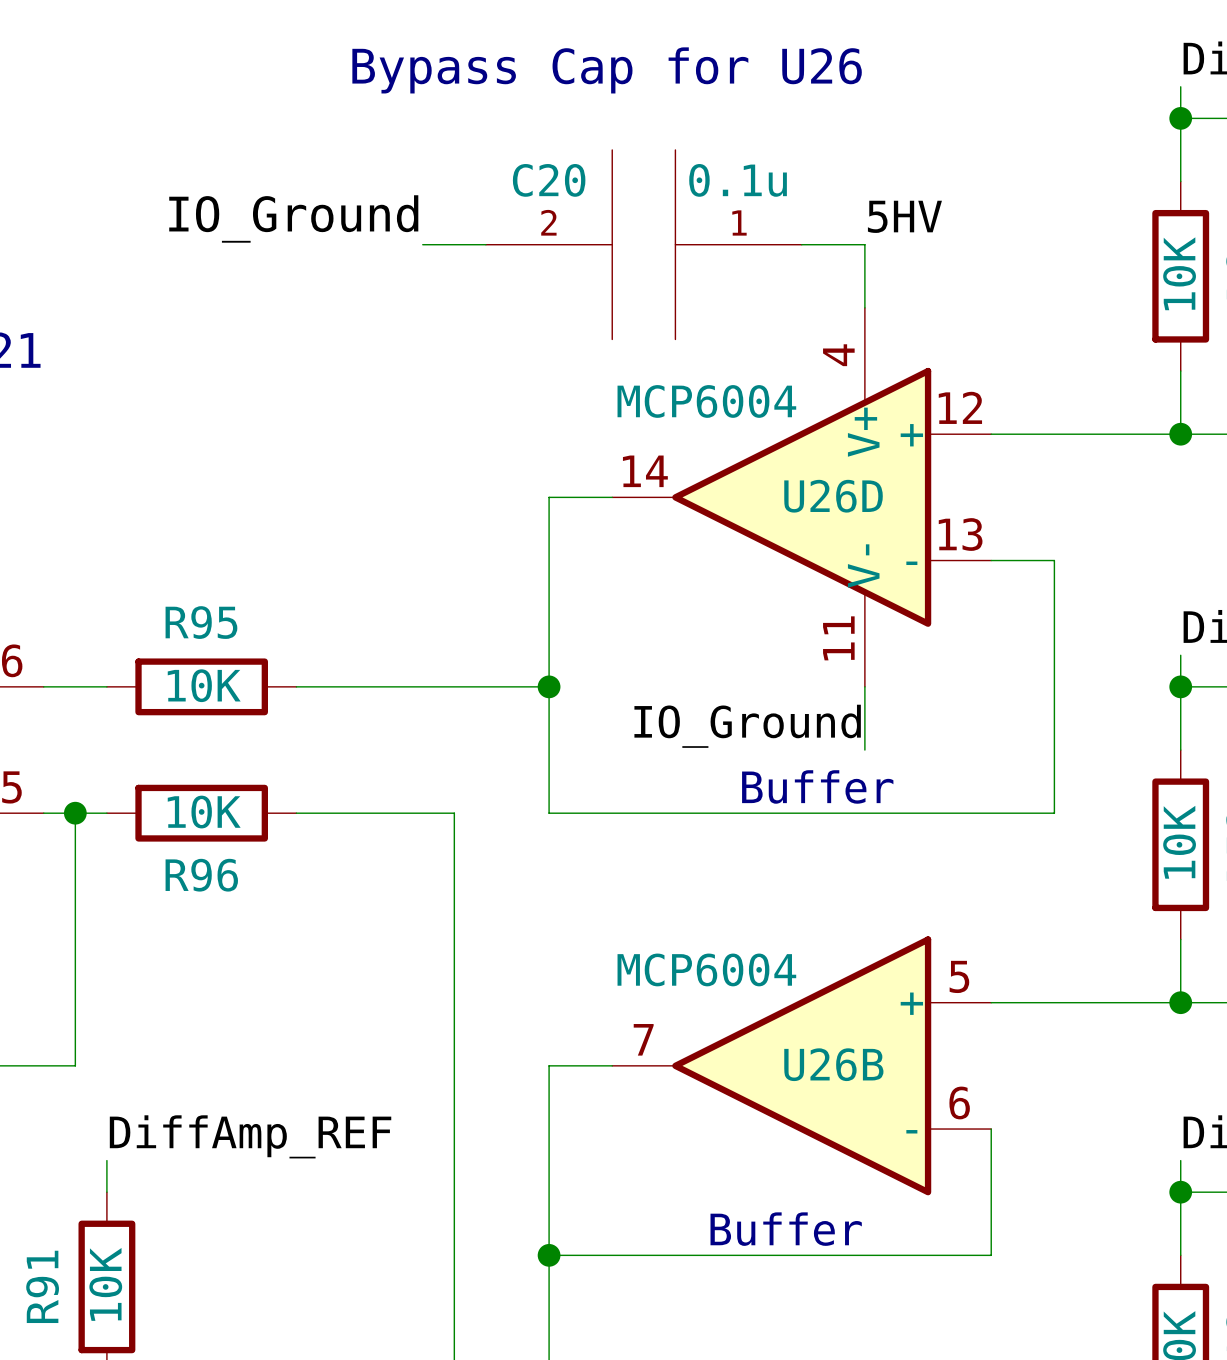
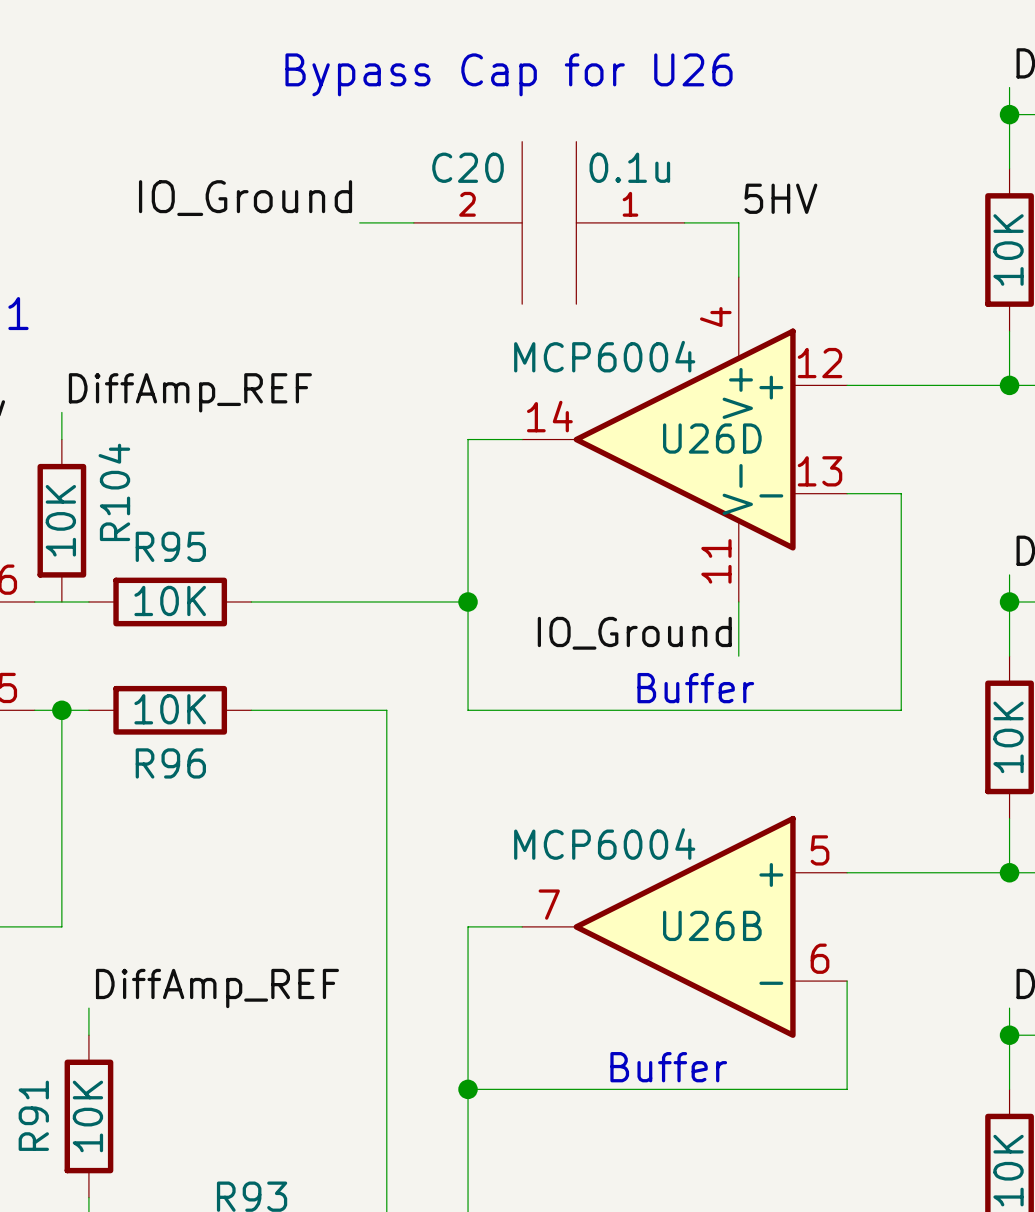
label: none -> DiffAmp_REF (190, 392)
wire: none -> (61, 412) (61, 439)
R104: none -> 10K (61, 520)

